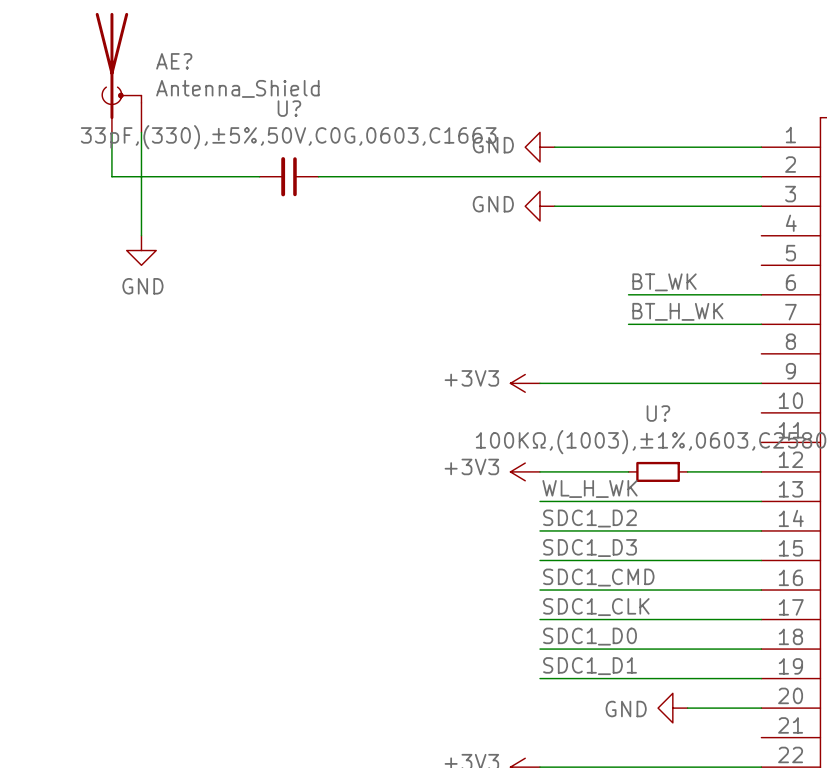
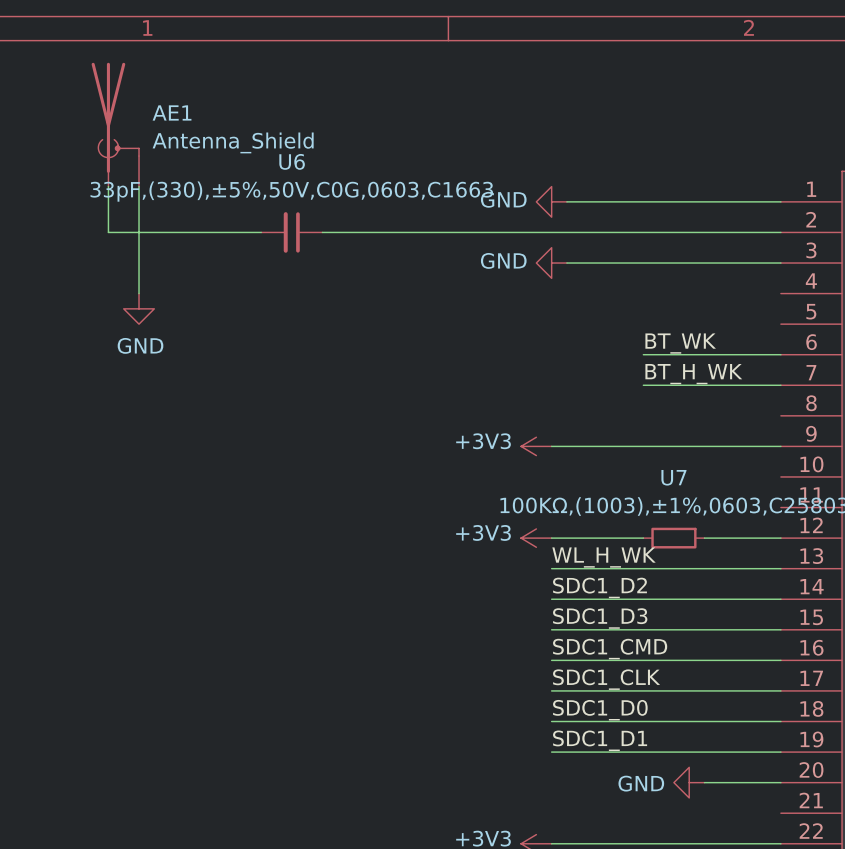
AE? name: AE? (174, 61) -> AE1 (172, 112)
U? name: U? (289, 108) -> U6 (292, 161)
U? name: U? (658, 413) -> U7 (673, 477)

